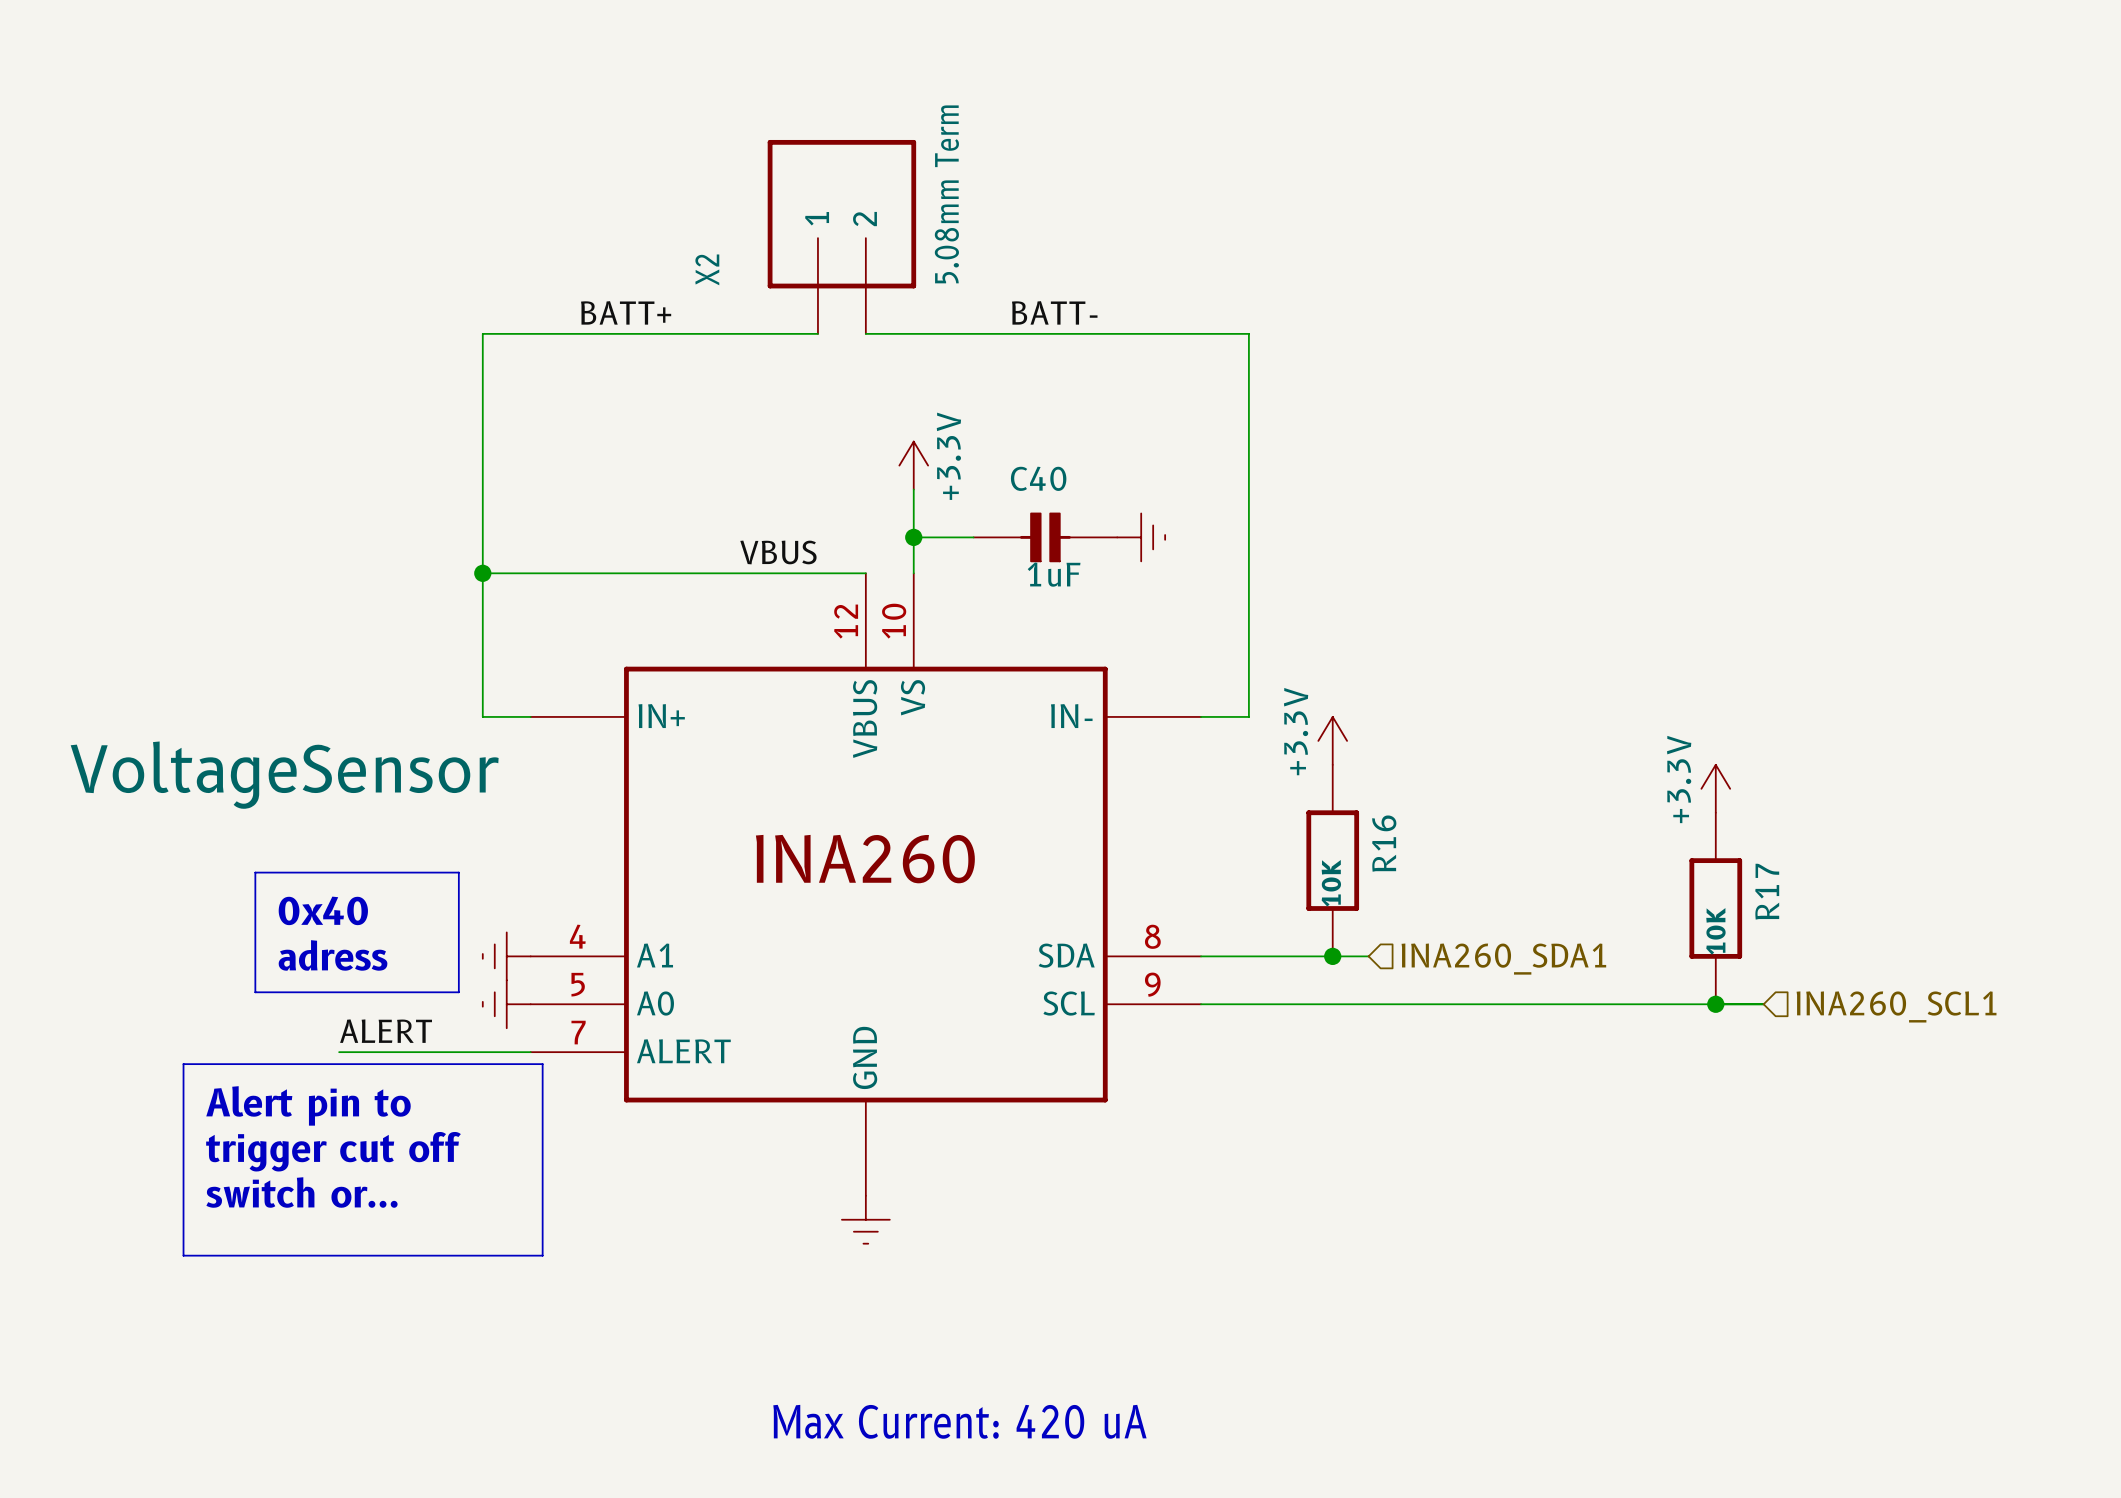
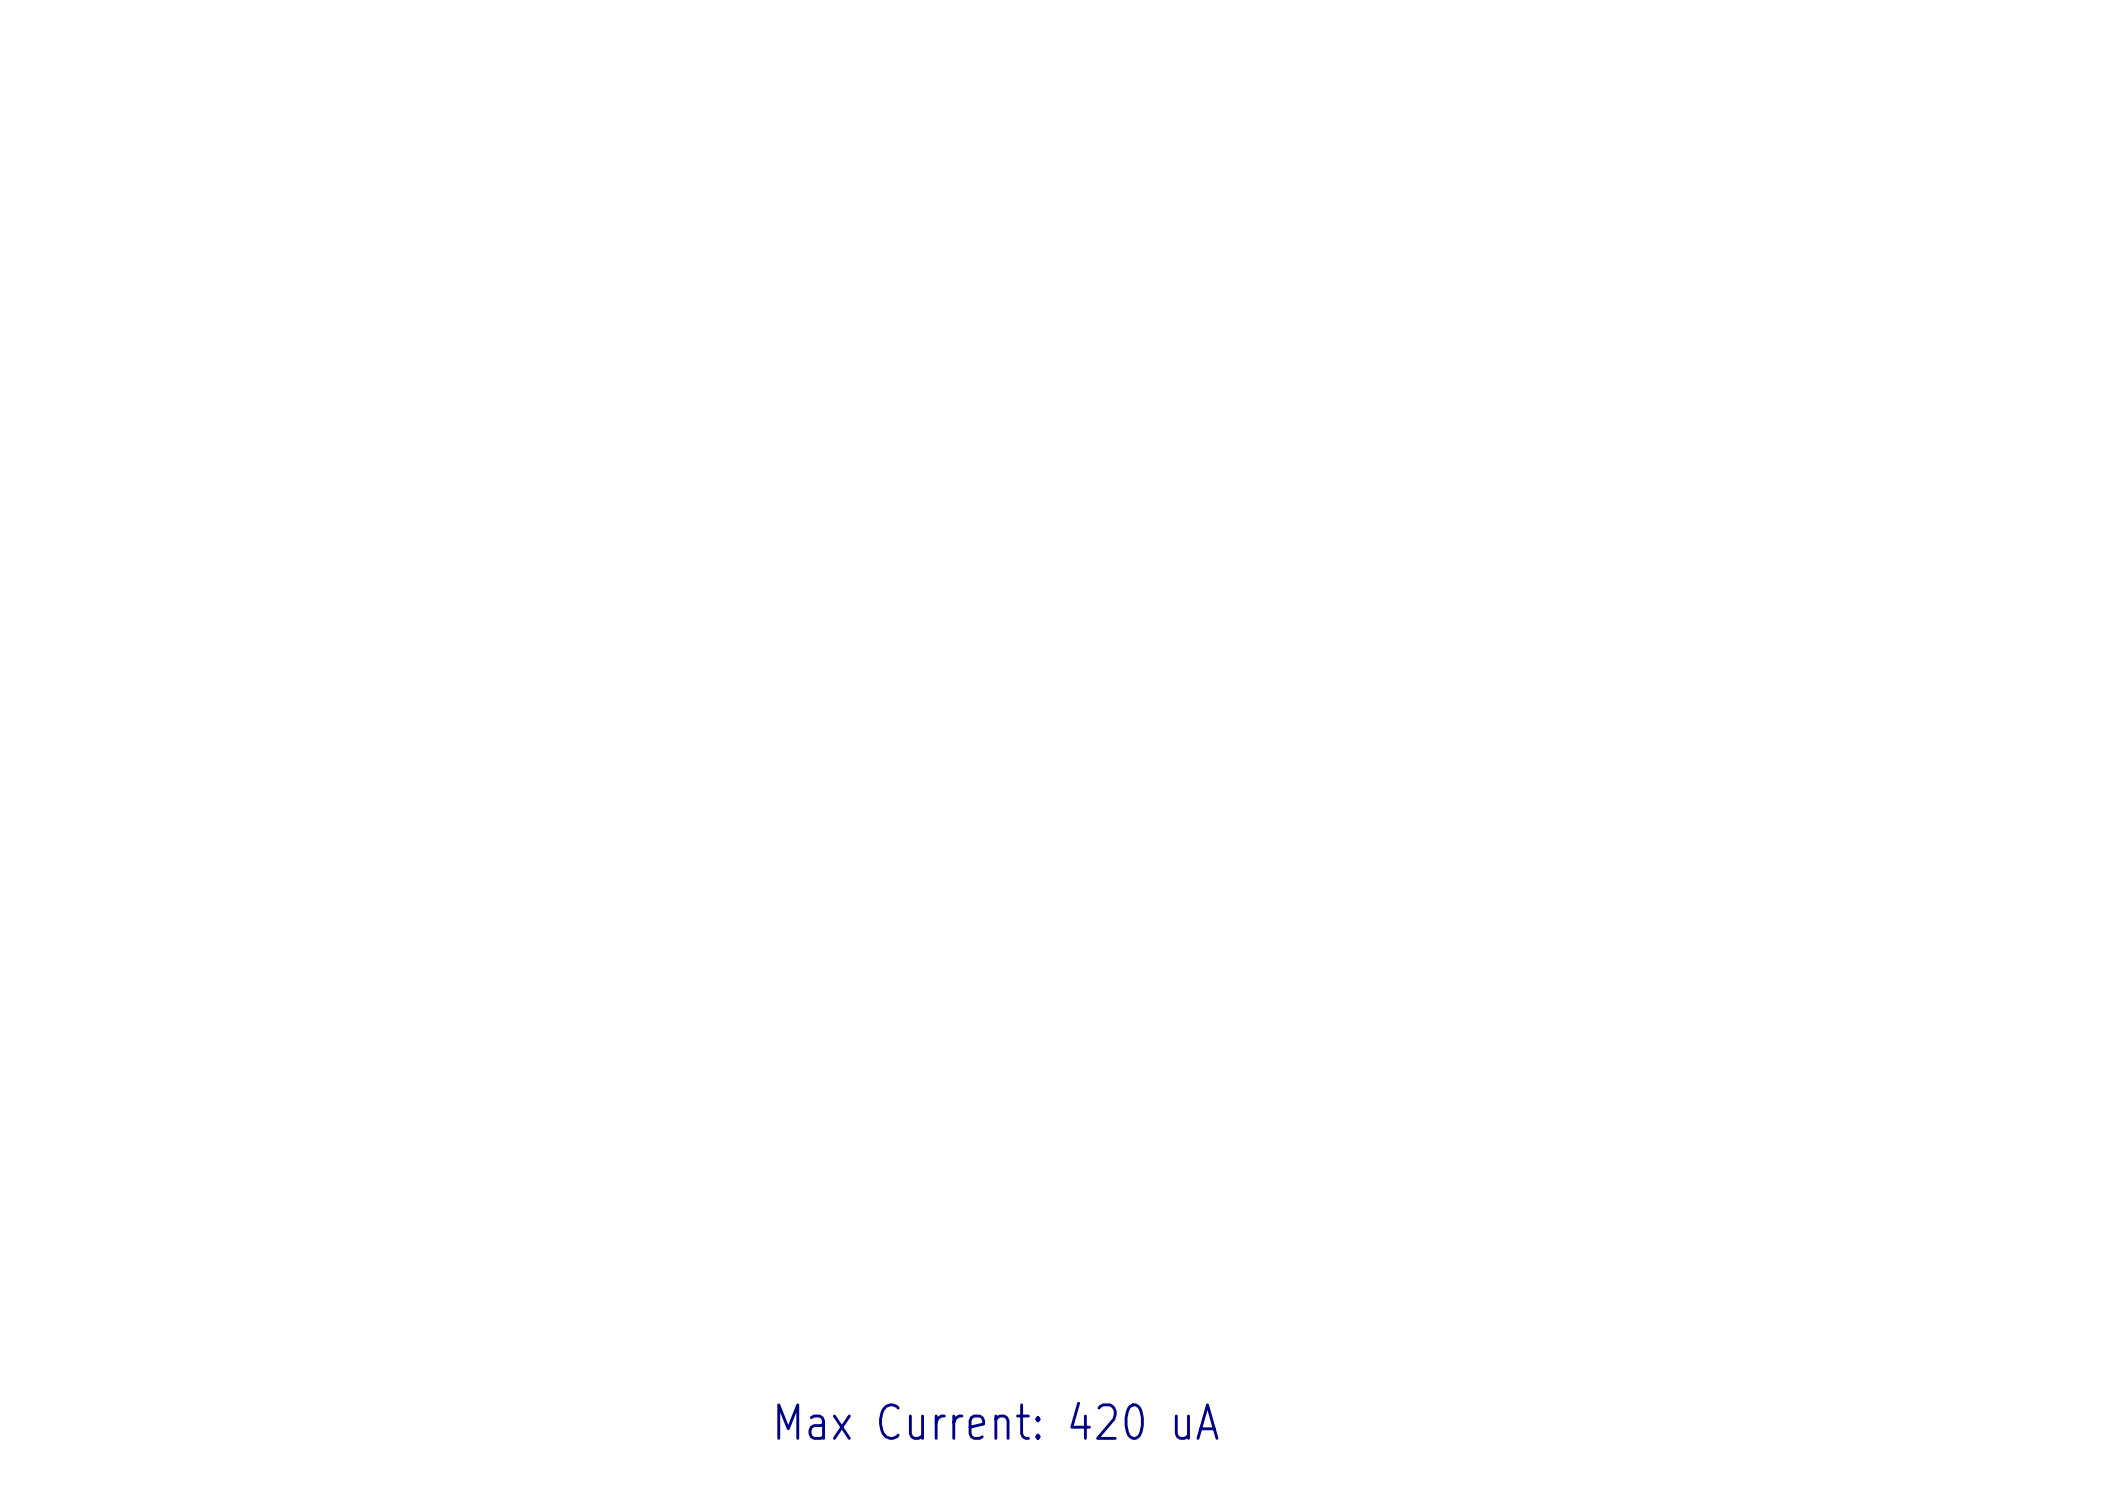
X2: 5.08mm Term (841, 236) -> none
label: BATT+ (626, 312) -> none
label: BATT- (1054, 312) -> none
wire: (817, 333) (482, 333) (482, 716) (530, 716) -> none
wire: (865, 333) (1248, 333) (1248, 716) (1201, 716) -> none
power symbol: +3.3V (913, 465) -> none
wire: (913, 489) (913, 573) -> none
wire: (913, 537) (973, 537) -> none
junction: (913, 537) -> none
C40: 1uF (1045, 537) -> none
power symbol: (1141, 537) -> none
label: VBUS (778, 552) -> none
wire: (482, 573) (865, 573) -> none
junction: (482, 573) -> none
power symbol: +3.3V (1332, 740) -> none
power symbol: +3.3V (1715, 788) -> none
R16: 10K (1332, 860) -> none
line: (255, 872) (458, 872) (458, 992) (255, 992) (255, 872) -> none
VoltageSensor: (865, 884) -> none
R17: 10K (1715, 908) -> none
text: 0x40 (323, 910) -> none
text: adress (333, 955) -> none
power symbol: (506, 956) -> none
wire: (1201, 956) (1368, 956) -> none
junction: (1332, 956) -> none
hierarchical label: INA260_SDA1 (1503, 959) -> none
power symbol: (506, 1004) -> none
wire: (1201, 1004) (1763, 1004) -> none
junction: (1715, 1004) -> none
hierarchical label: INA260_SCL1 (1896, 1006) -> none
label: ALERT (386, 1031) -> none
wire: (339, 1052) (530, 1052) -> none
line: (183, 1064) (542, 1064) (542, 1255) (183, 1255) (183, 1064) -> none
text: Alert pin to (308, 1105) -> none
text: trigger cut off (333, 1151) -> none
text: switch or... (301, 1192) -> none
power symbol: (865, 1219) -> none

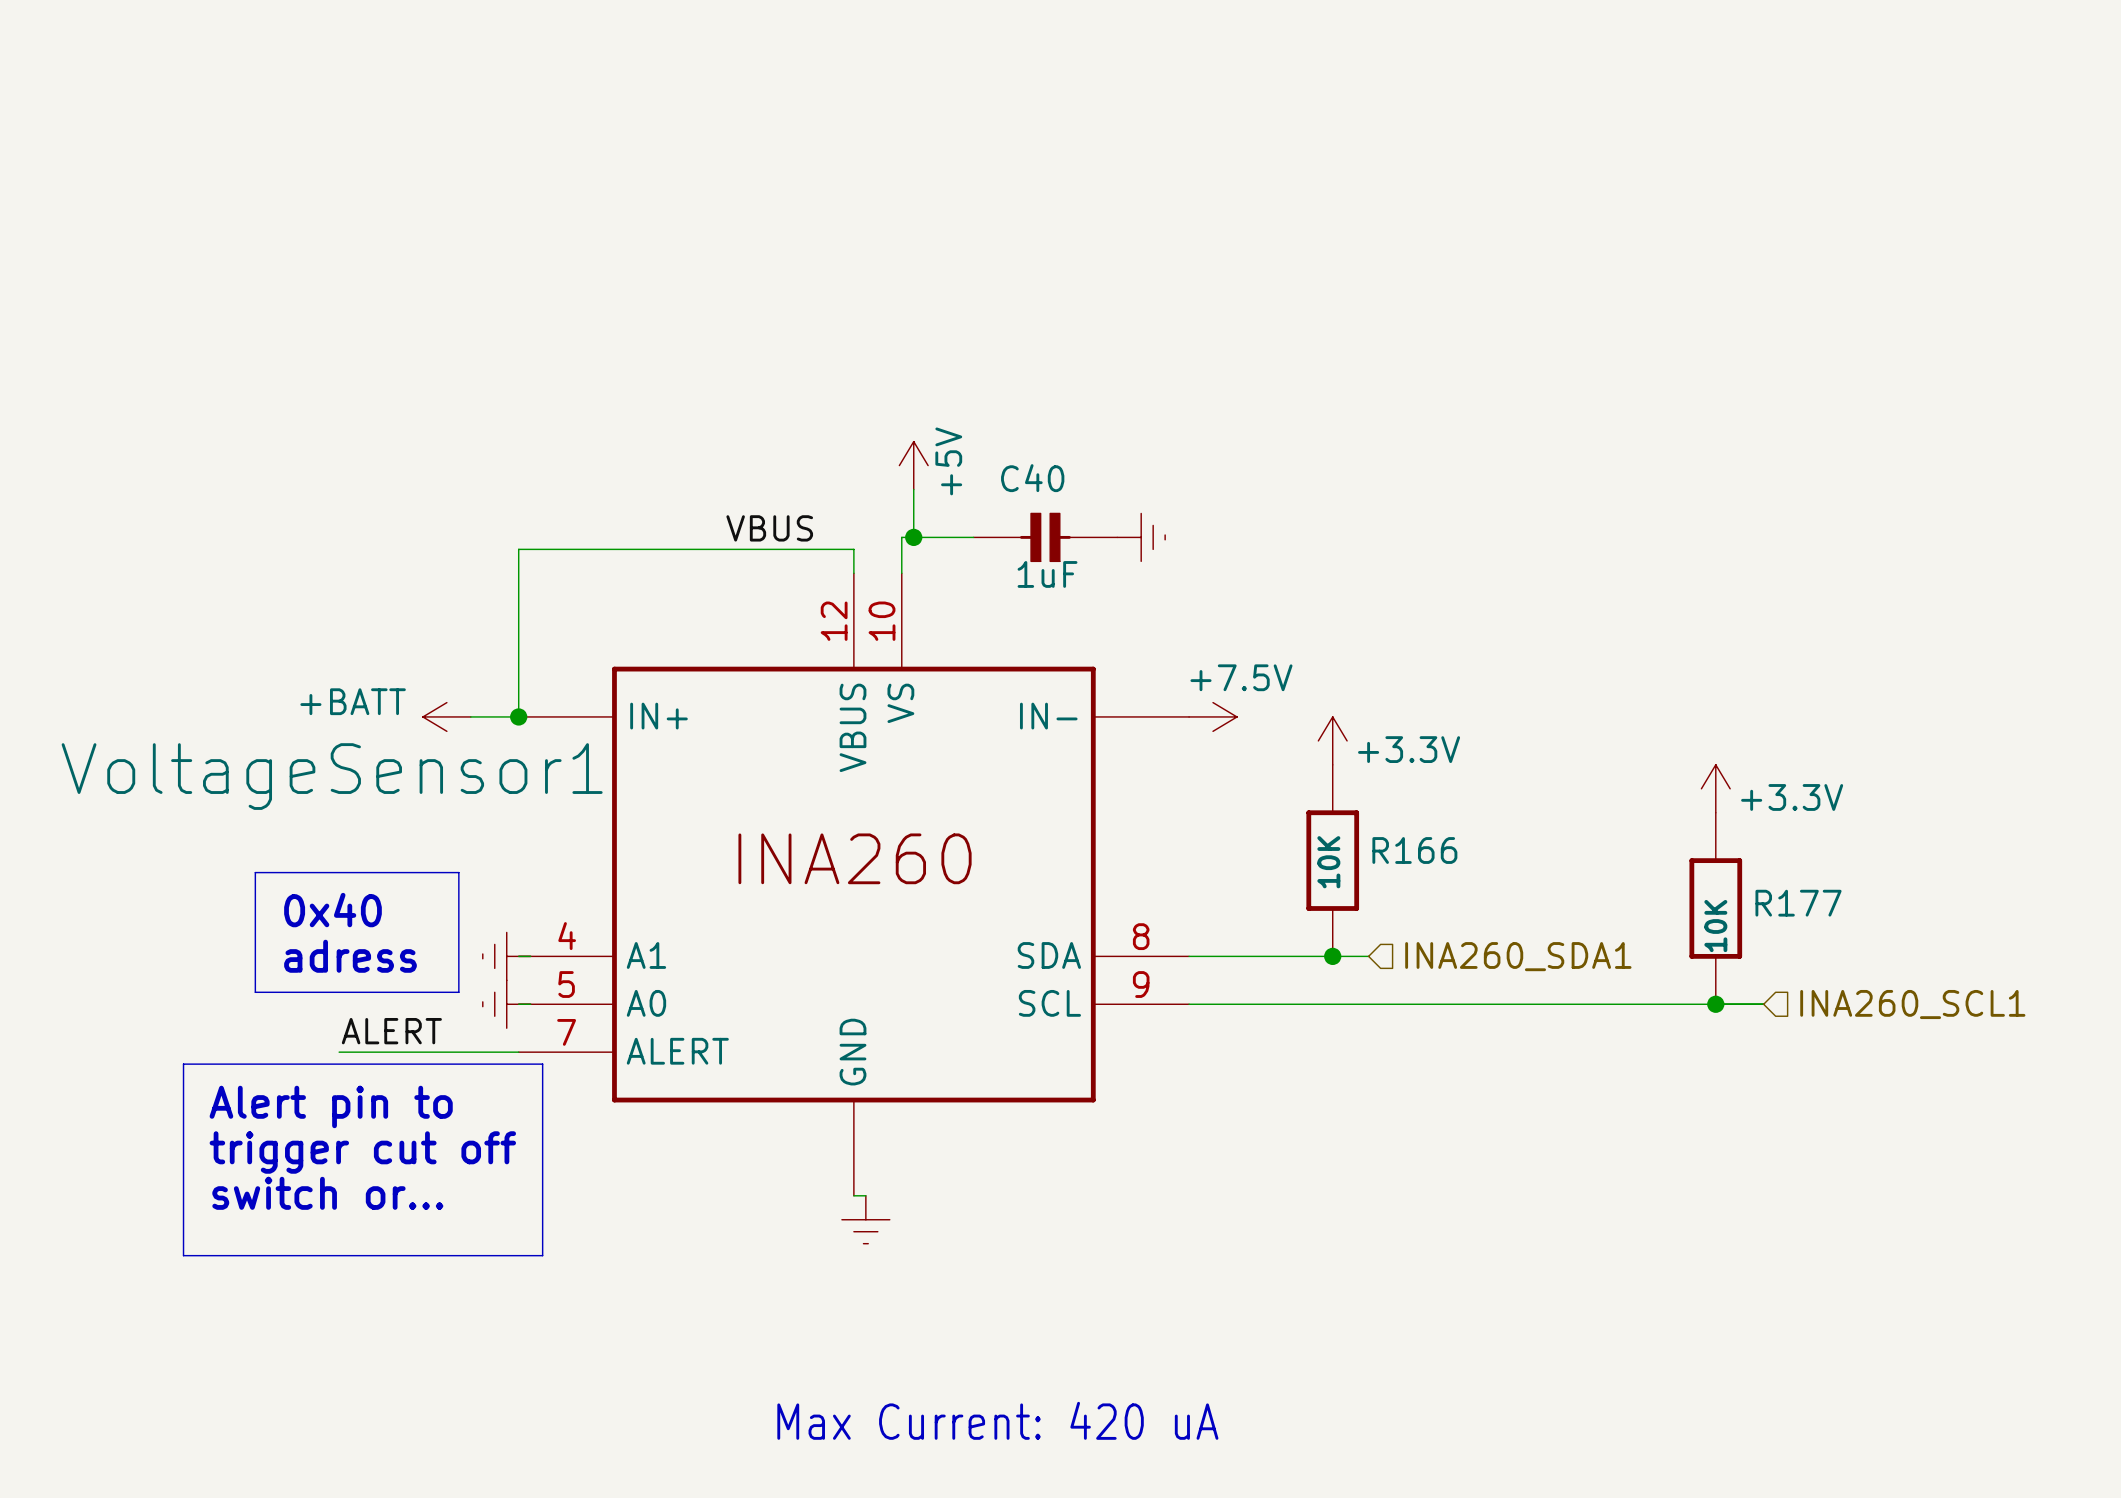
power symbol: none -> +5V (913, 465)
wire: none -> (913, 489) (913, 537)
label: none -> VBUS (769, 528)
junction: none -> (913, 537)
wire: none -> (973, 537) (901, 537) (901, 573)
C40: none -> 1uF (1045, 537)
power symbol: none -> (1141, 537)
wire: none -> (853, 573) (853, 549) (518, 549) (518, 716) (470, 716)
power symbol: none -> +BATT (446, 716)
junction: none -> (518, 716)
power symbol: none -> +7.5V (1213, 716)
power symbol: none -> +3.3V (1332, 740)
power symbol: none -> +3.3V (1715, 788)
R166: none -> 10K (1332, 860)
line: none -> (255, 872) (458, 872) (458, 992) (255, 992) (255, 872)
VoltageSensor1: none -> (853, 884)
R177: none -> 10K (1715, 908)
text: none -> 0x40 (332, 910)
text: none -> adress (350, 956)
power symbol: none -> (506, 956)
wire: none -> (518, 956) (530, 956)
wire: none -> (1189, 956) (1368, 956)
junction: none -> (1332, 956)
hierarchical label: none -> INA260_SDA1 (1518, 956)
power symbol: none -> (506, 1004)
wire: none -> (518, 1004) (530, 1004)
wire: none -> (1189, 1004) (1763, 1004)
junction: none -> (1715, 1004)
hierarchical label: none -> INA260_SCL1 (1912, 1004)
label: none -> ALERT (391, 1031)
wire: none -> (339, 1052) (518, 1052)
line: none -> (183, 1064) (542, 1064) (542, 1255) (183, 1255) (183, 1064)
text: none -> Alert pin to (331, 1106)
text: none -> trigger cut off (362, 1152)
text: none -> switch or... (327, 1193)
wire: none -> (853, 1195) (865, 1195)
power symbol: none -> (865, 1219)

